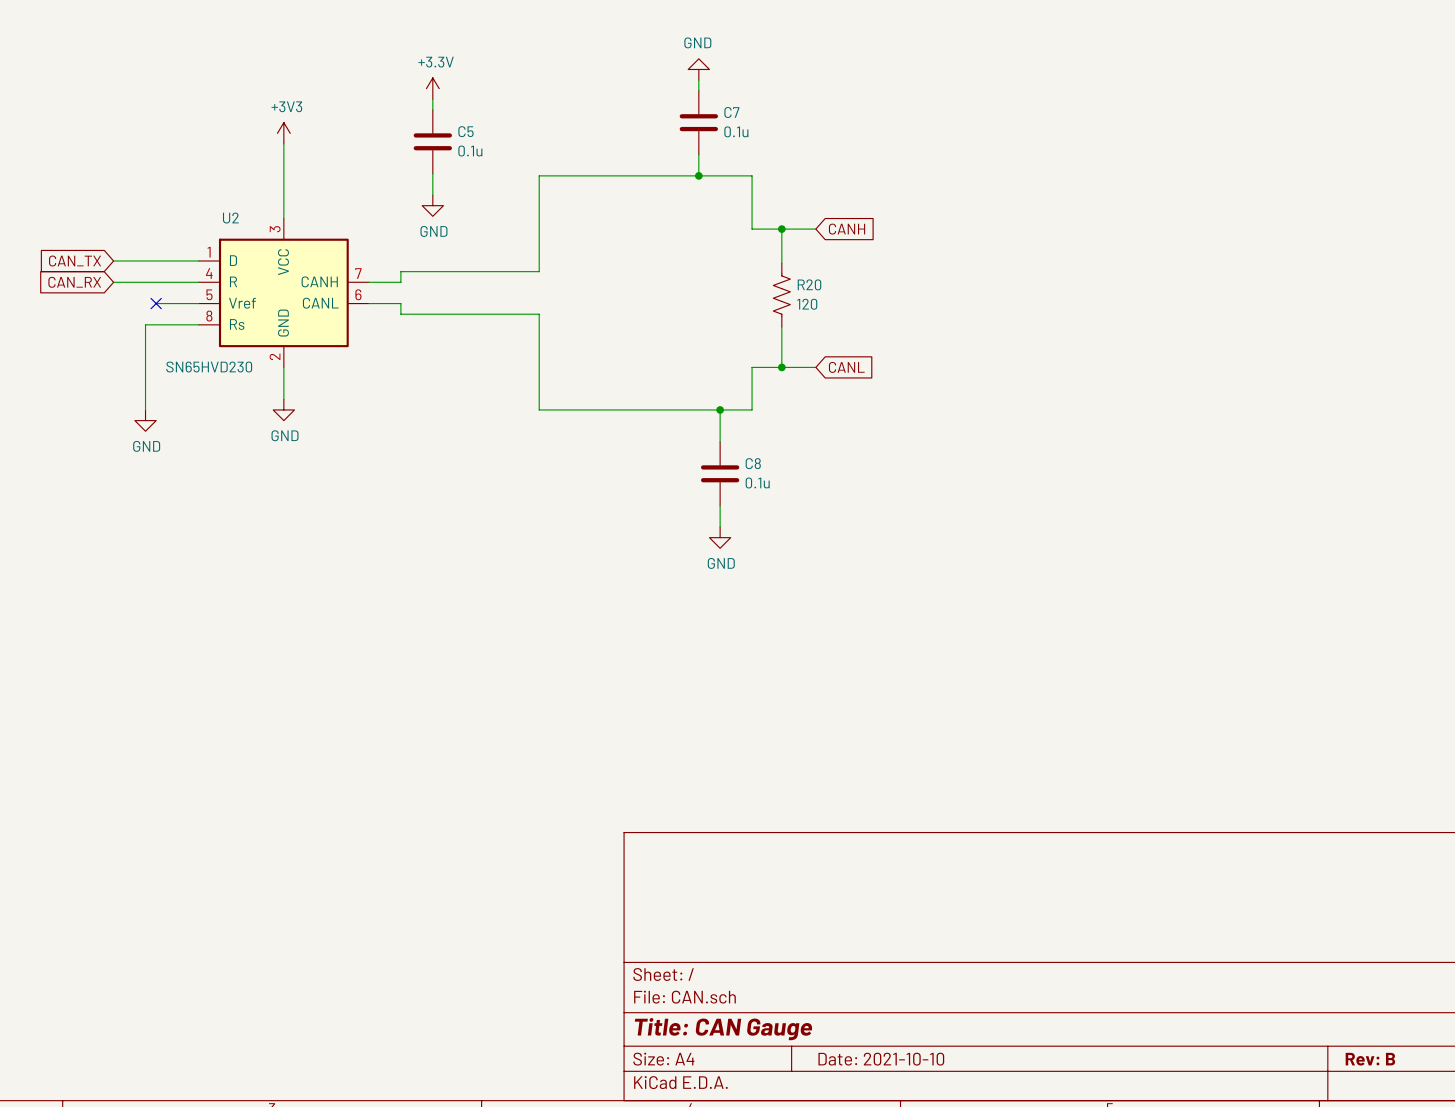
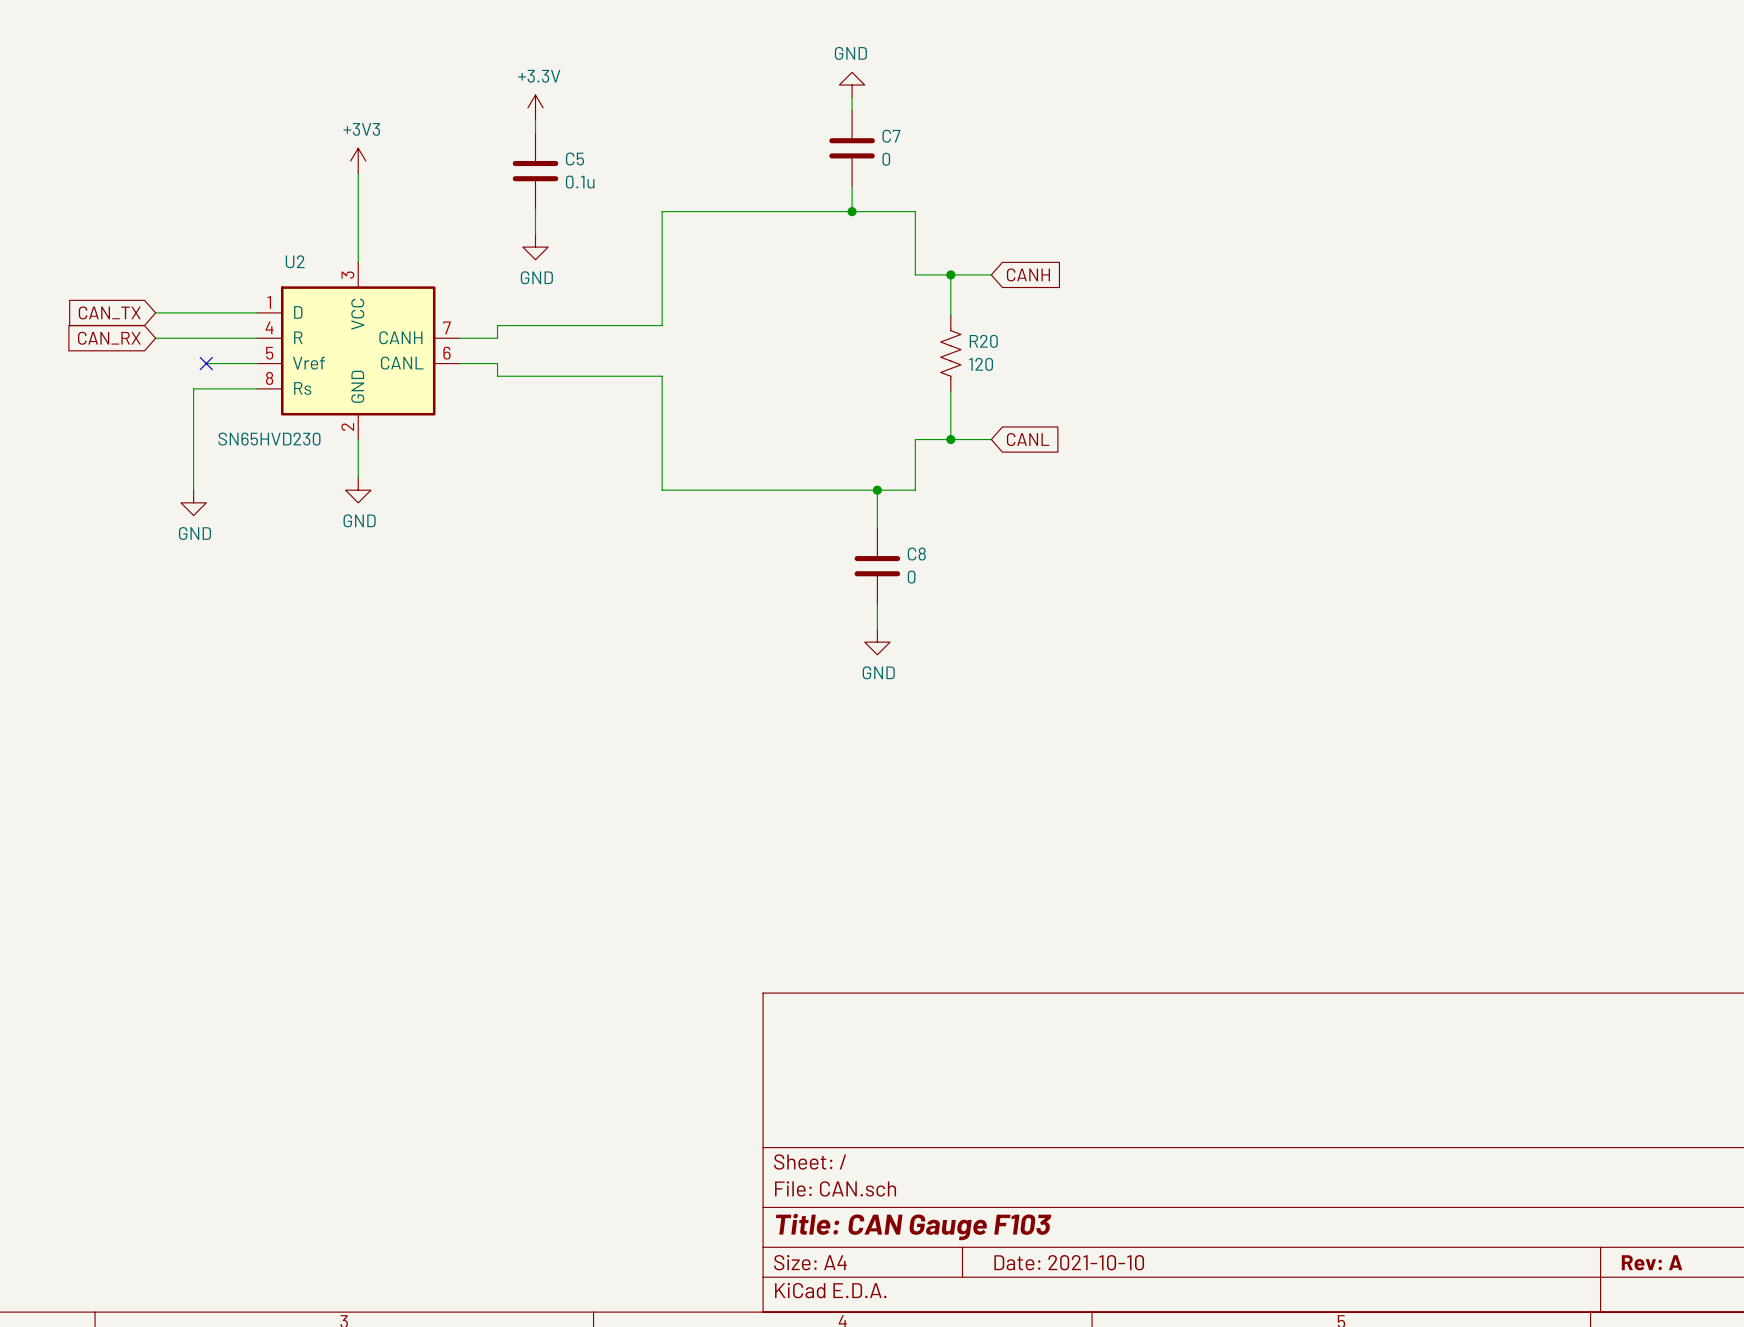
C7 value: 0.1u (736, 131) -> 0 (886, 159)
C8 value: 0.1u (757, 483) -> 0 (911, 577)
title block: Title: CAN Gauge (723, 1029) -> Title: CAN Gauge F103 (913, 1227)
title block: Rev: B (1370, 1059) -> Rev: A (1652, 1262)

